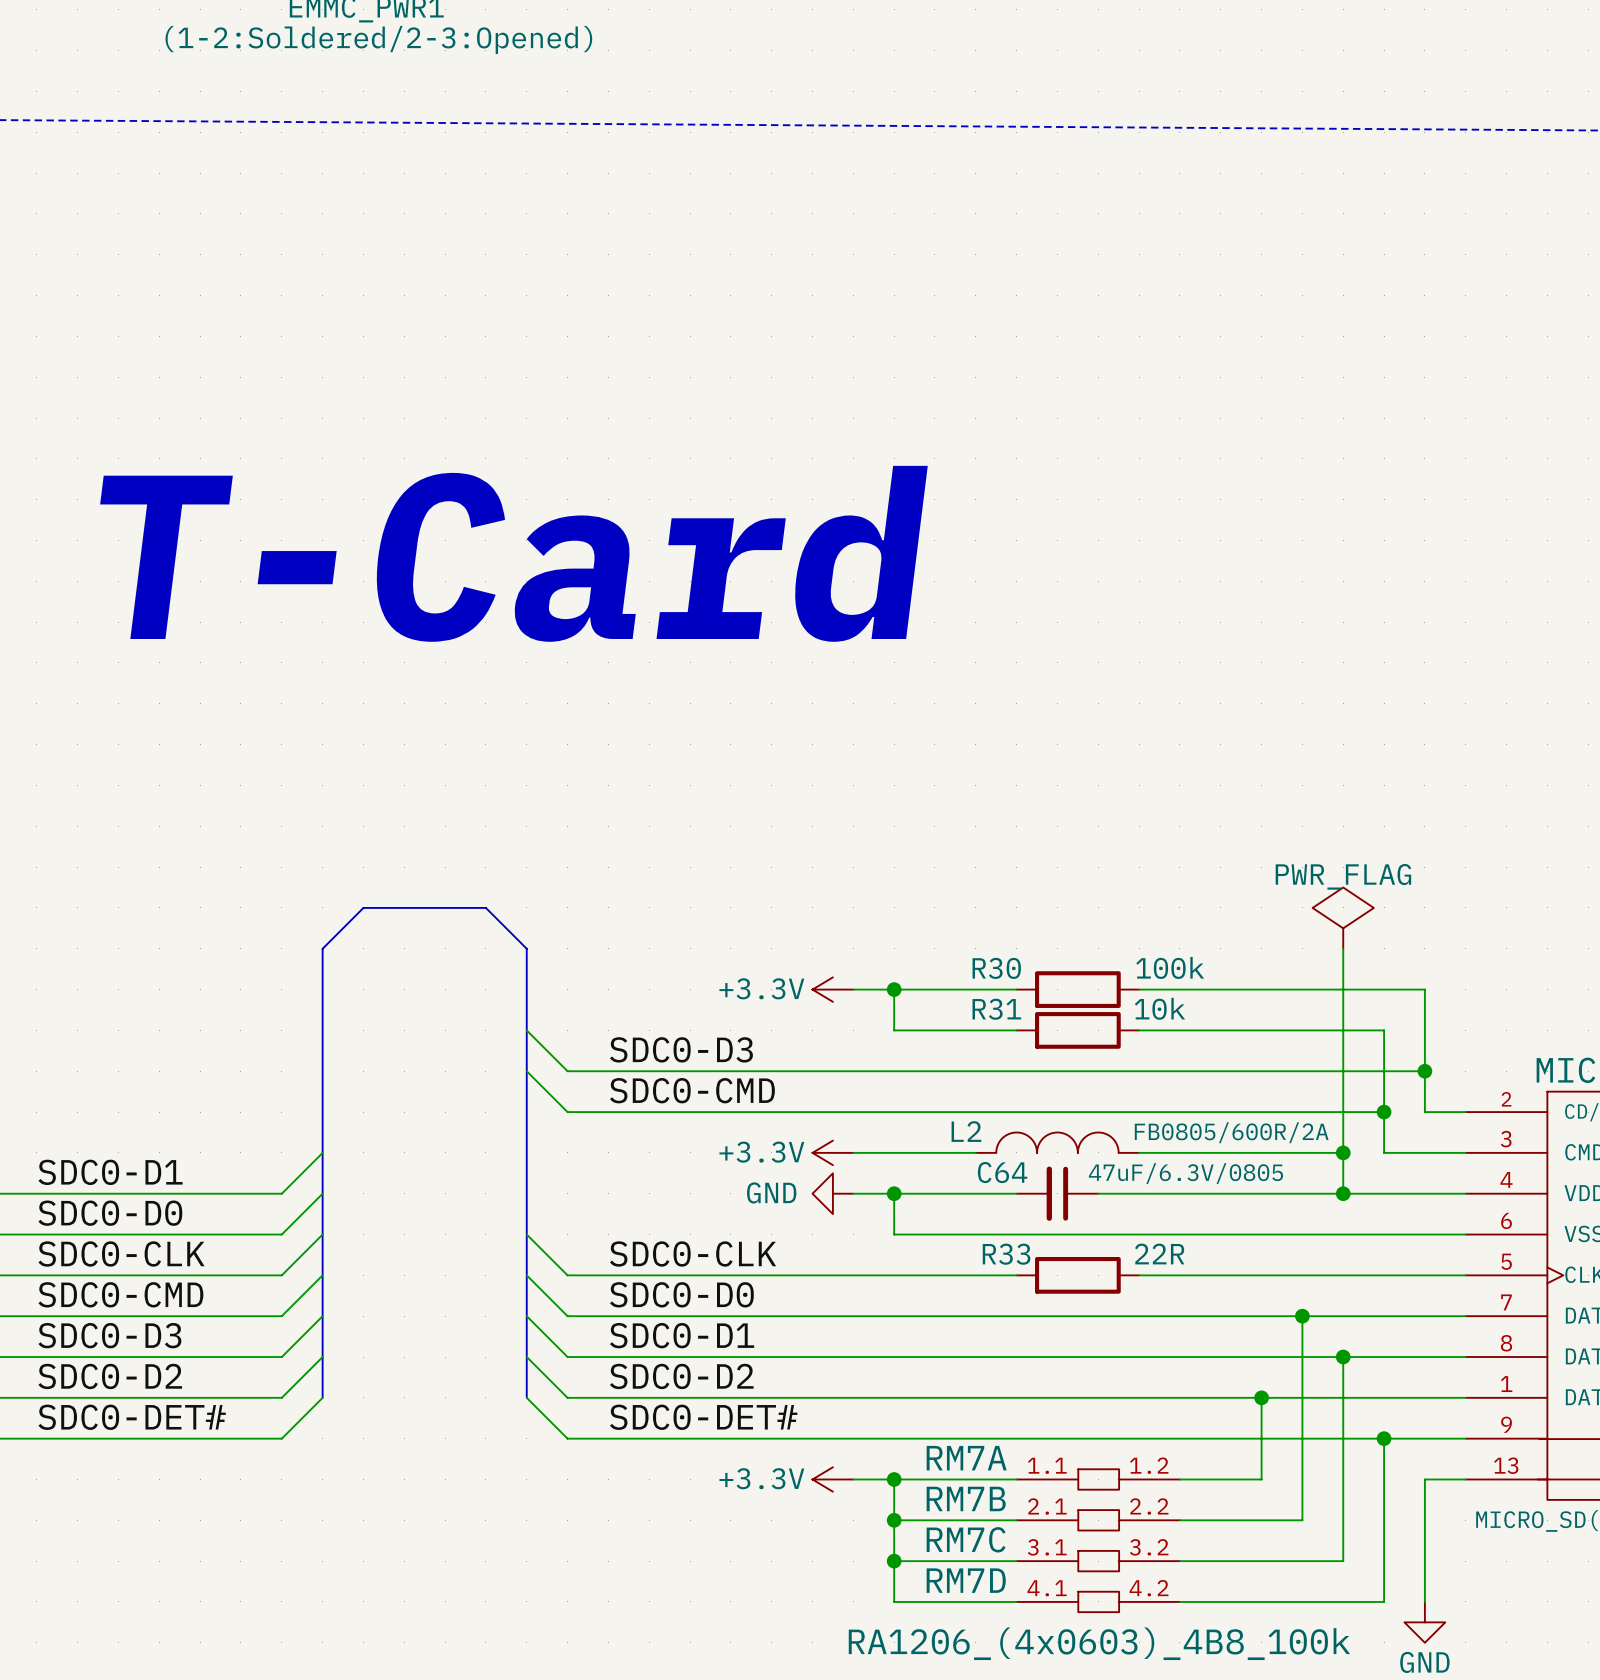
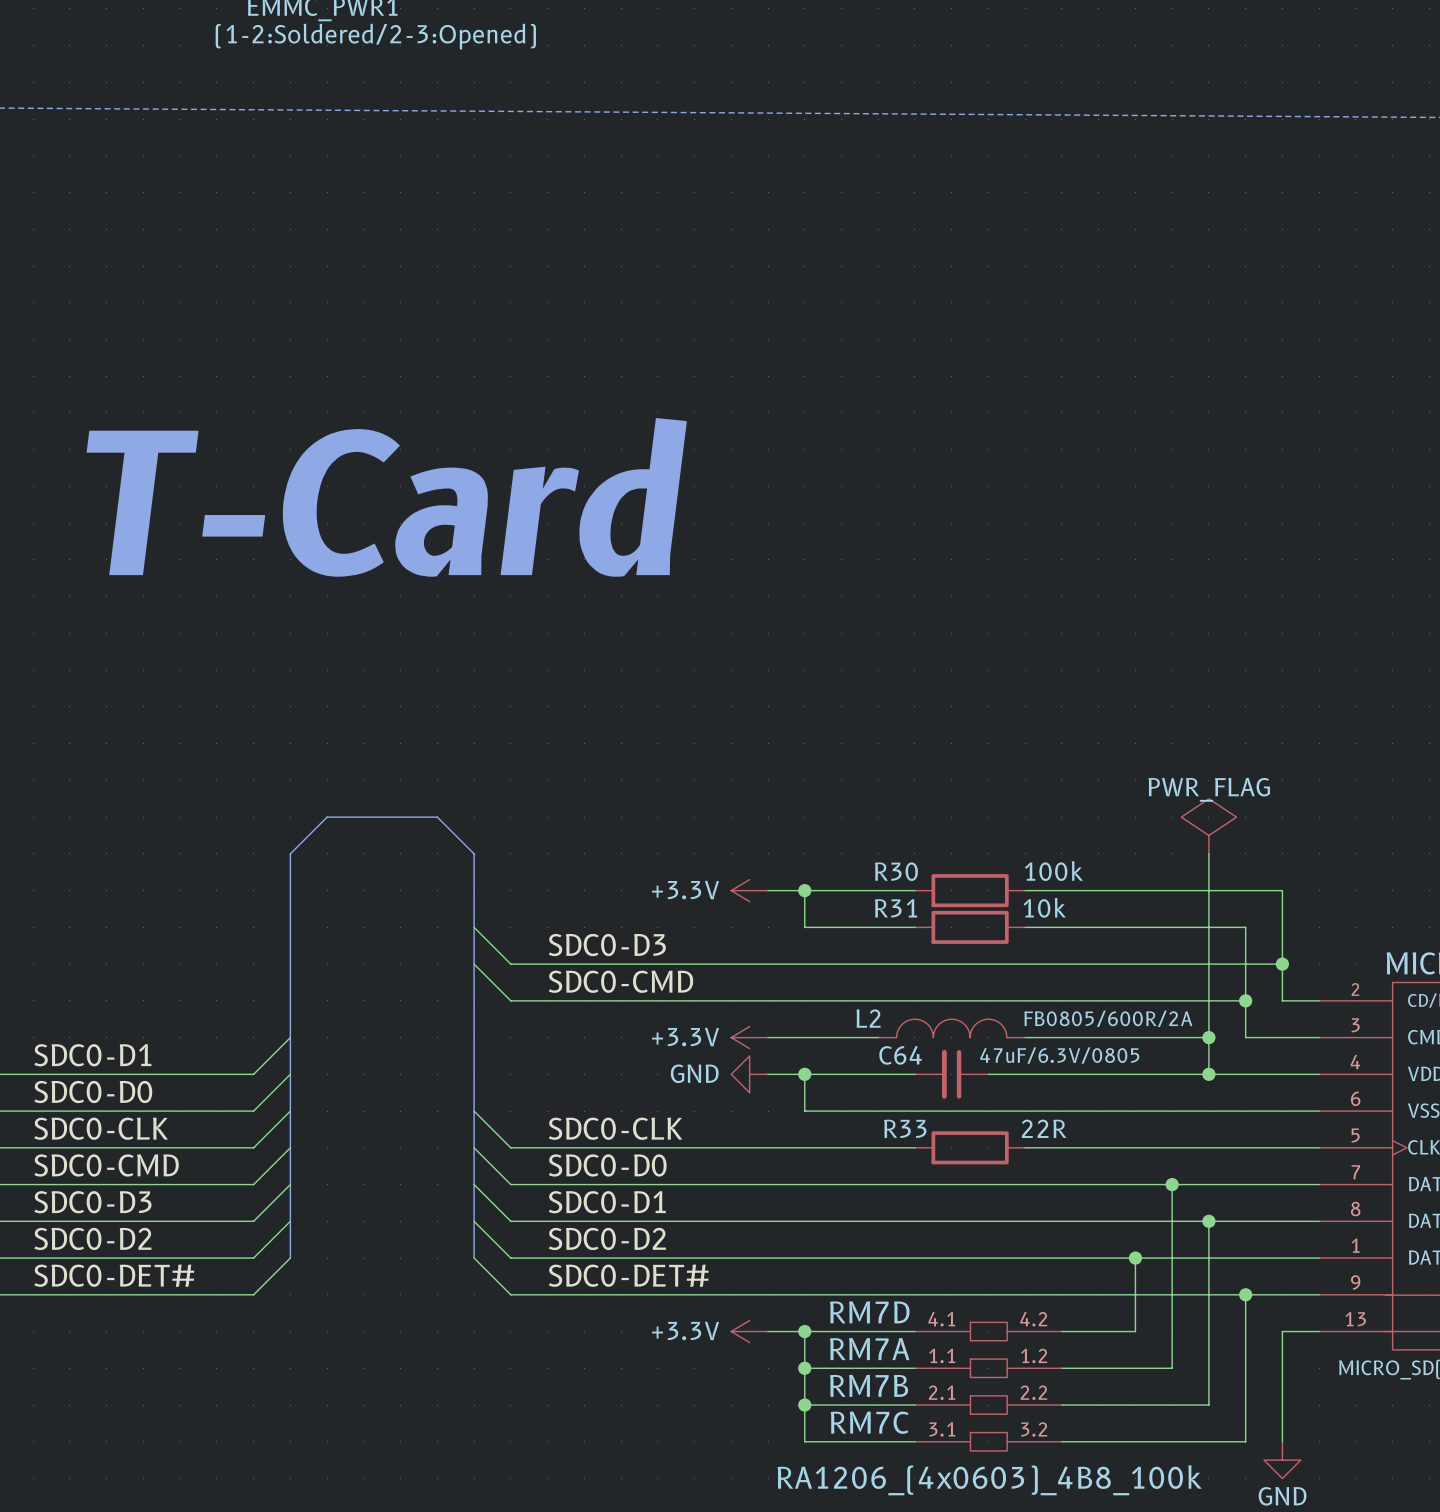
RM7A position: (1098, 1479) -> (988, 1368)
RM7B position: (1098, 1520) -> (988, 1405)
RM7C position: (1098, 1561) -> (988, 1441)
RM7D position: (1098, 1601) -> (988, 1331)

